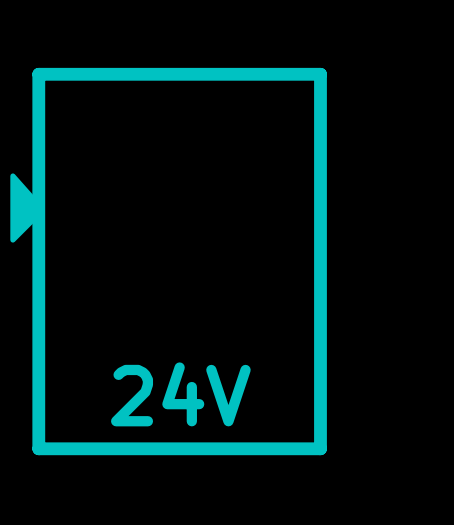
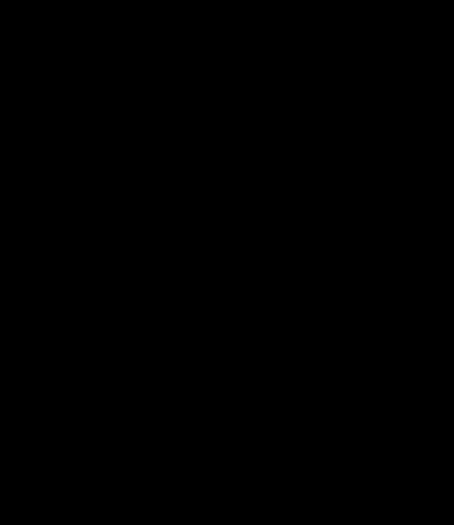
line: (38, 74) (320, 74) (320, 448) (38, 448) (38, 74) -> none
drawing: [10, 173, 44, 243] -> none
text: 24V (180, 394) -> none

